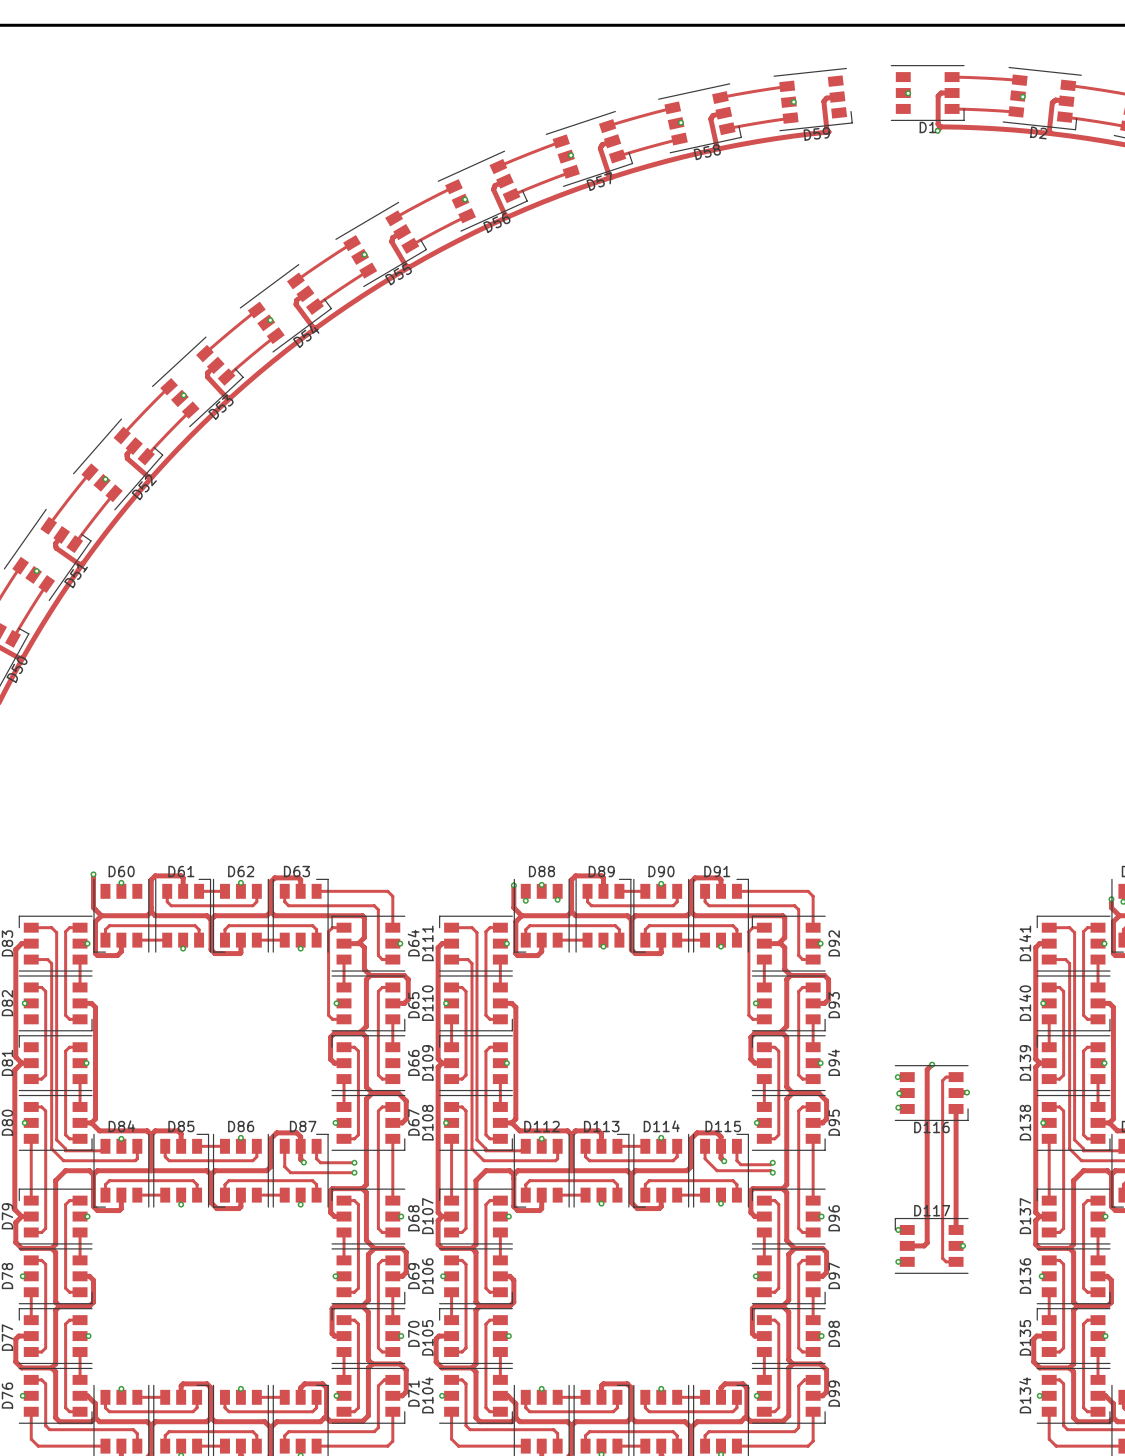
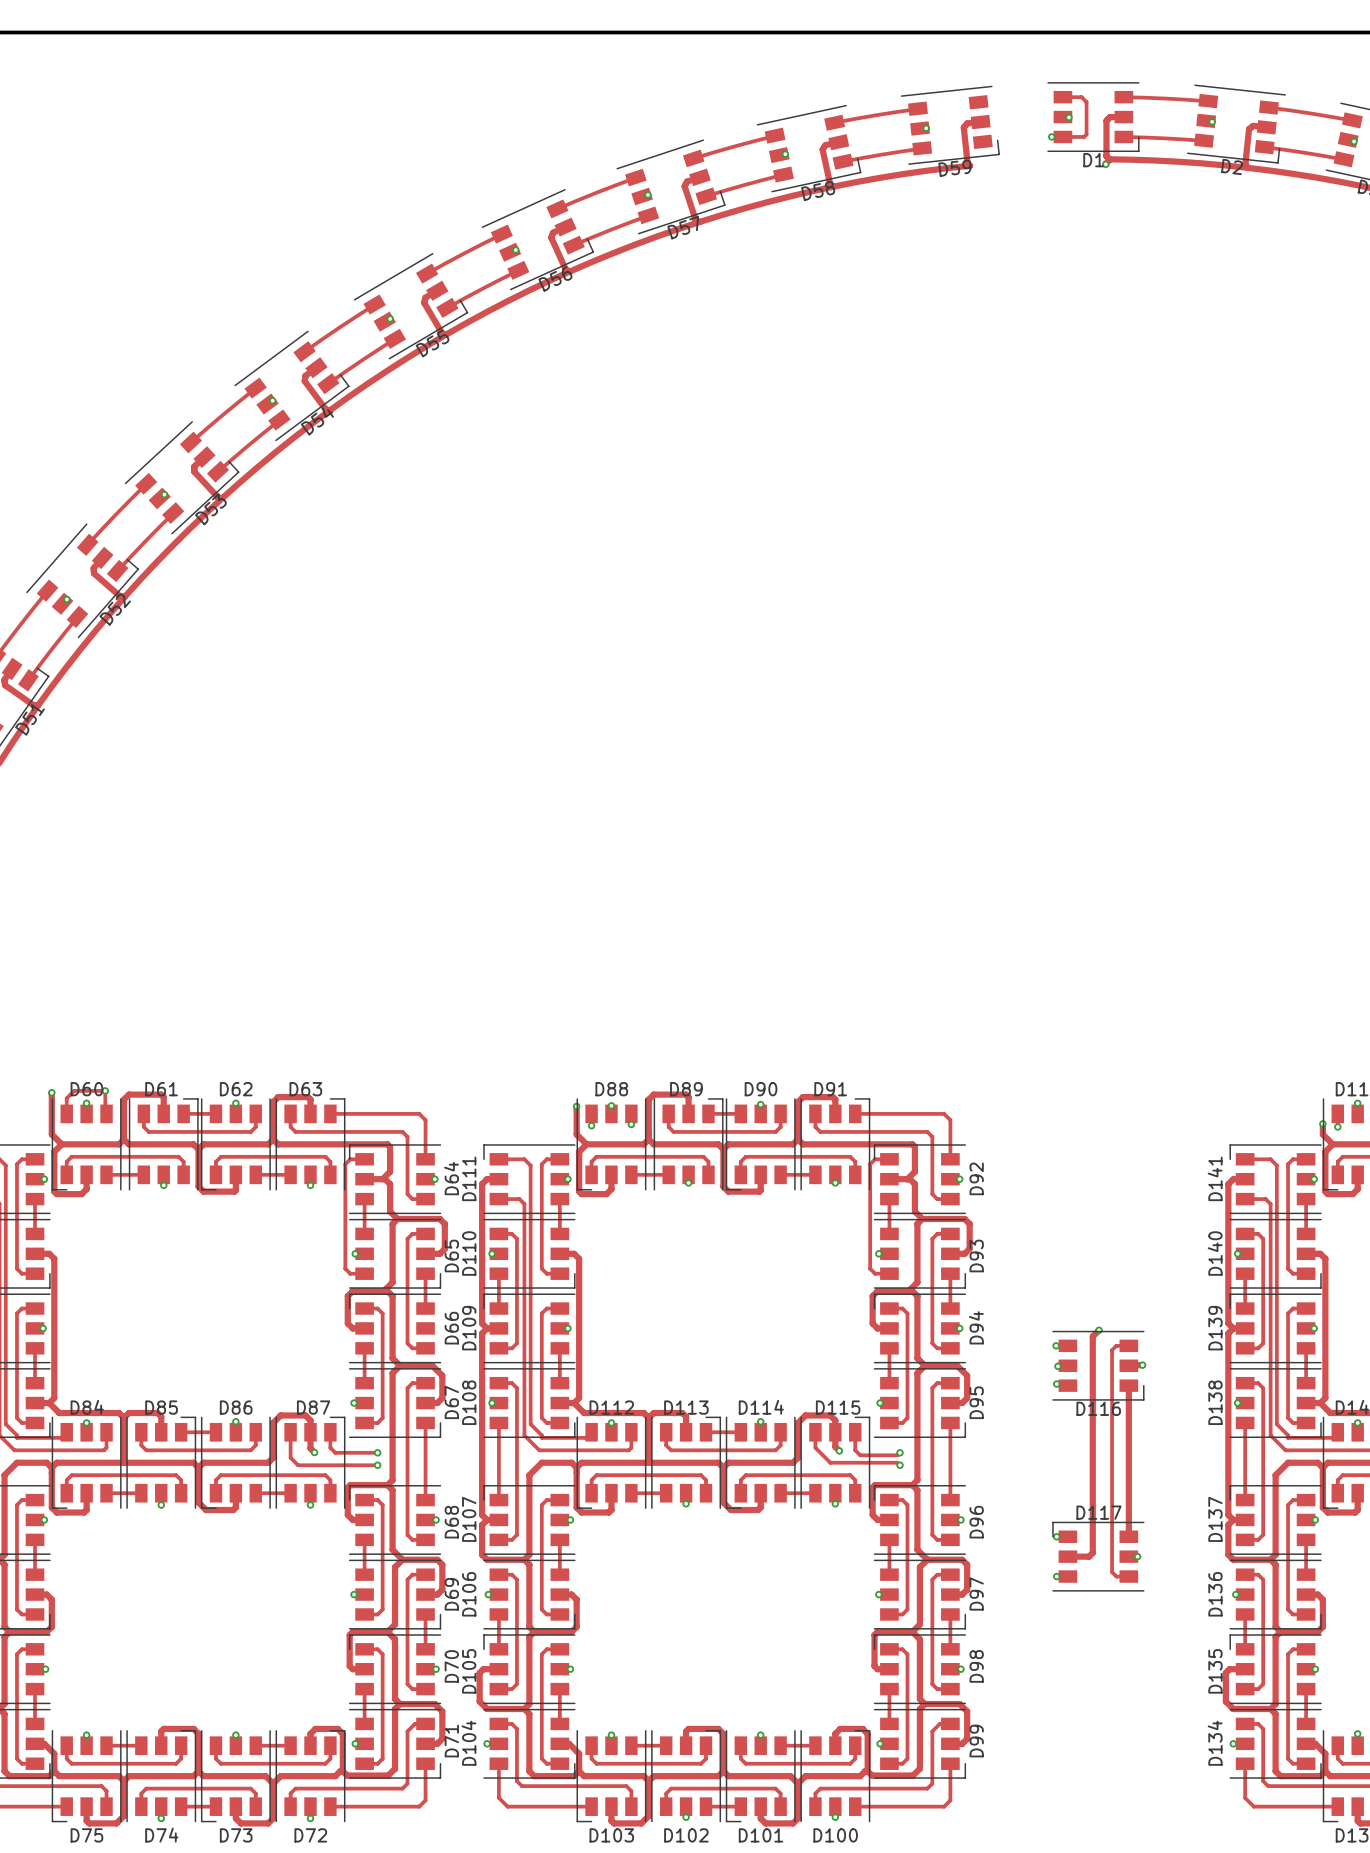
track: none -> (1062, 97) (1081, 97) (1086, 102) (1086, 134) (1084, 136) (1051, 136)
via: none -> (1051, 136)
via: none -> (105, 1090)
track: none -> (66, 1113) (66, 1098) (74, 1090) (105, 1090) (106, 1113)

